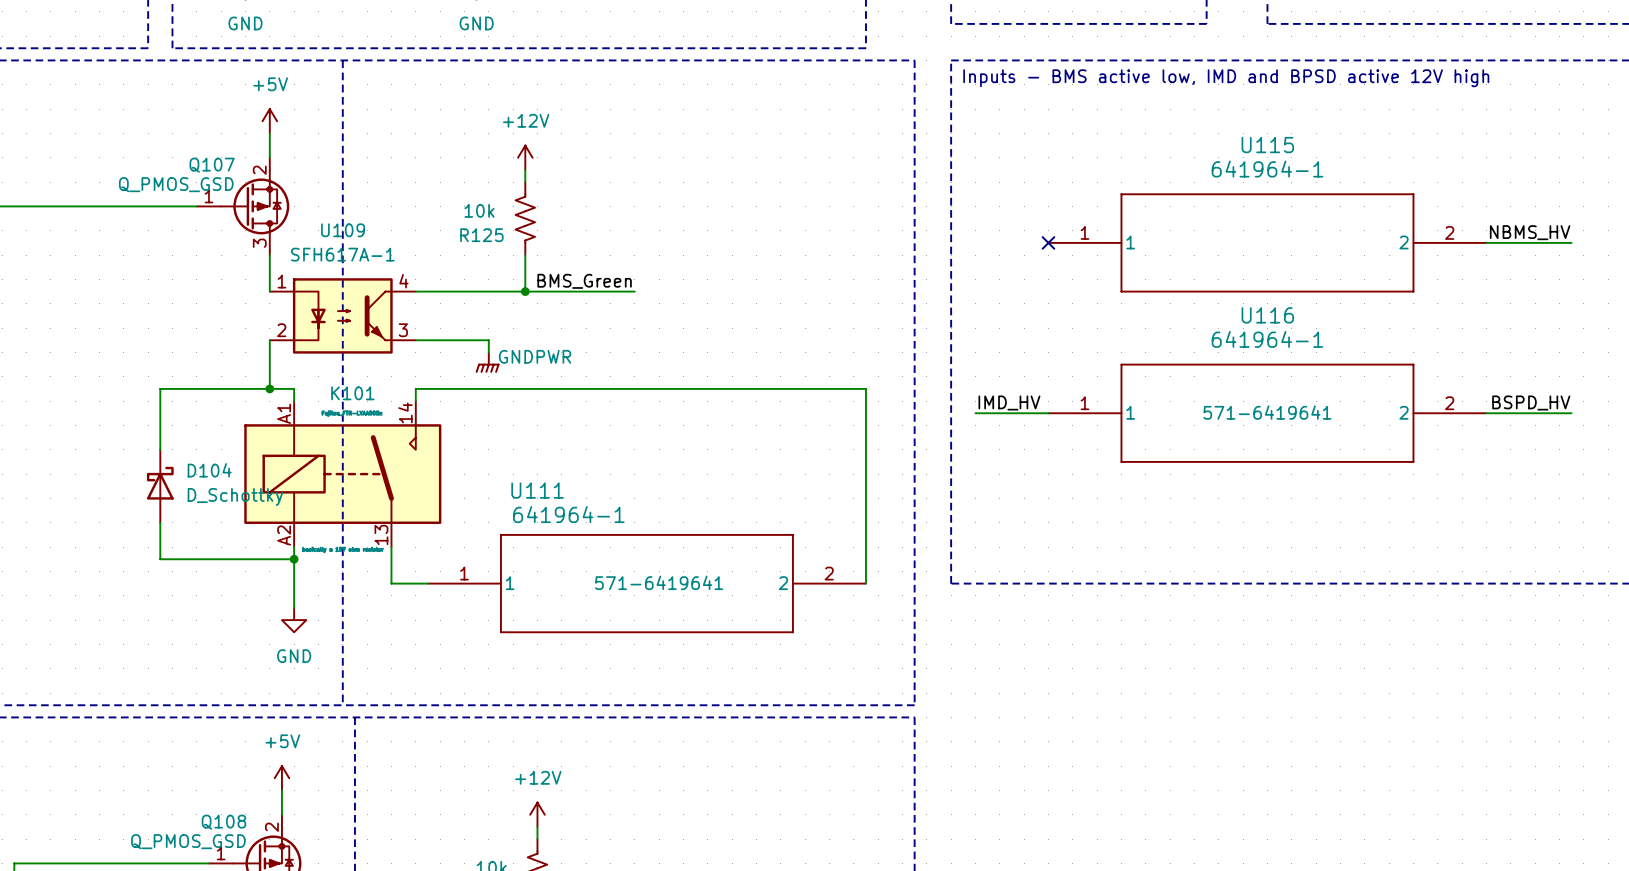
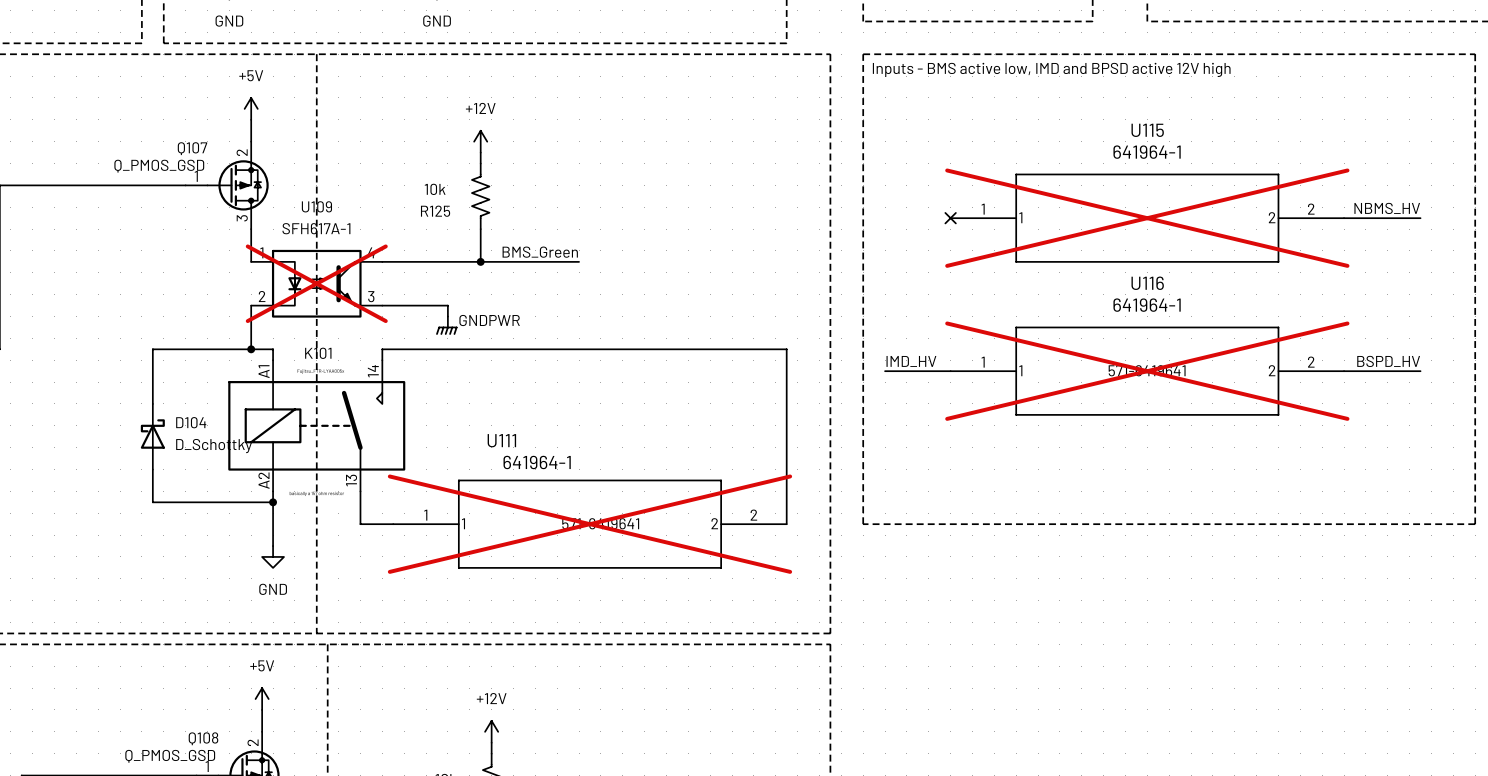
U115 do-not-place cross: none -> (1147, 218)
U109 do-not-place cross: none -> (316, 283)
U116 do-not-place cross: none -> (1147, 371)
U111 do-not-place cross: none -> (589, 524)

